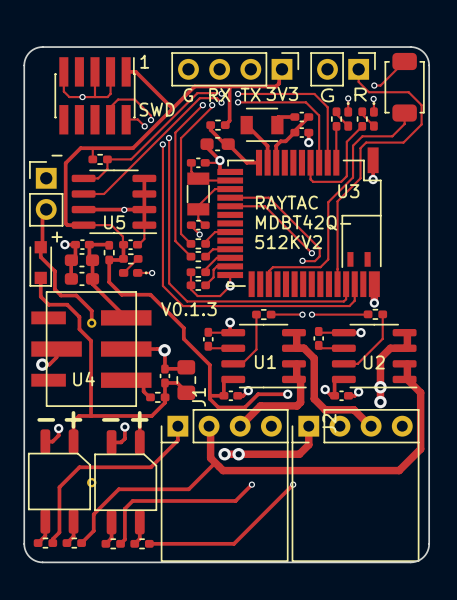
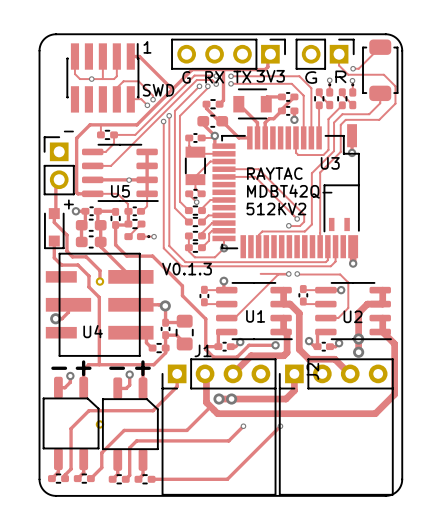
track: (256, 314) (256, 349) -> (288, 274) (278, 274) (247, 305)
part: (263, 314) -> none
track: (368, 314) (311, 314) -> none
part: (375, 314) -> none
track: (382, 314) (382, 338) (368, 352) -> (297, 274) (340, 274) (348, 282) (348, 308)
J1 name rotation: 0° (198, 397) -> 90° clockwise (202, 350)

